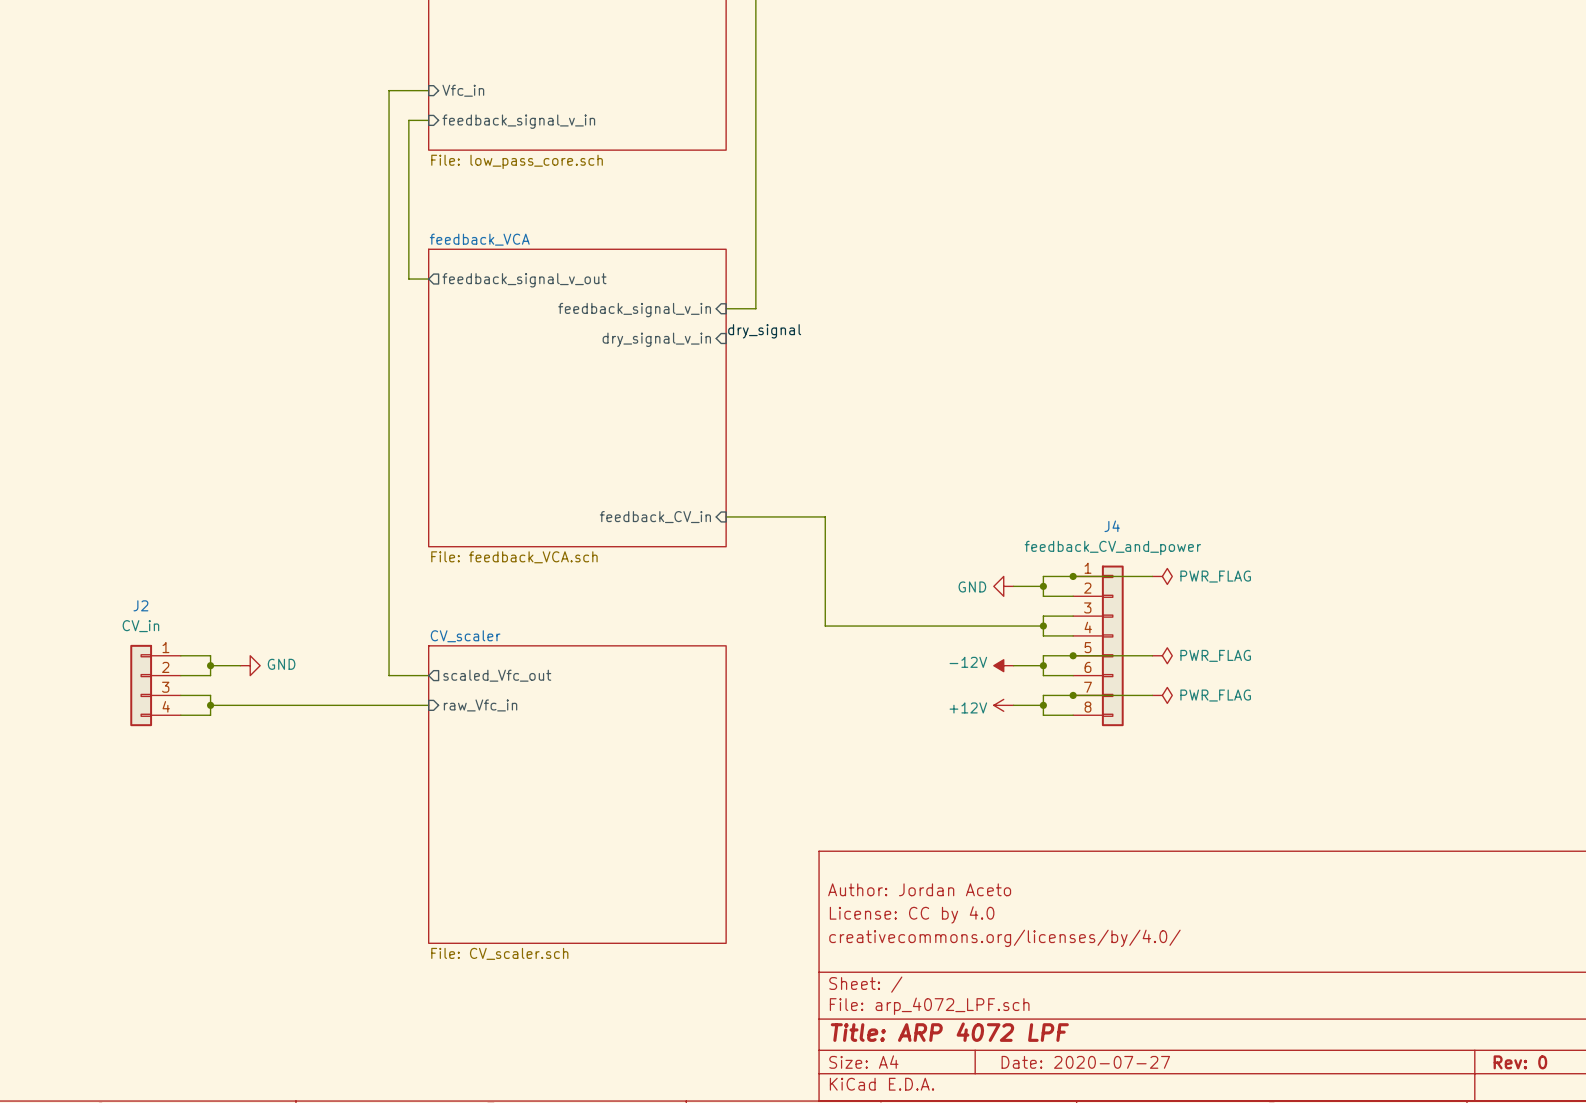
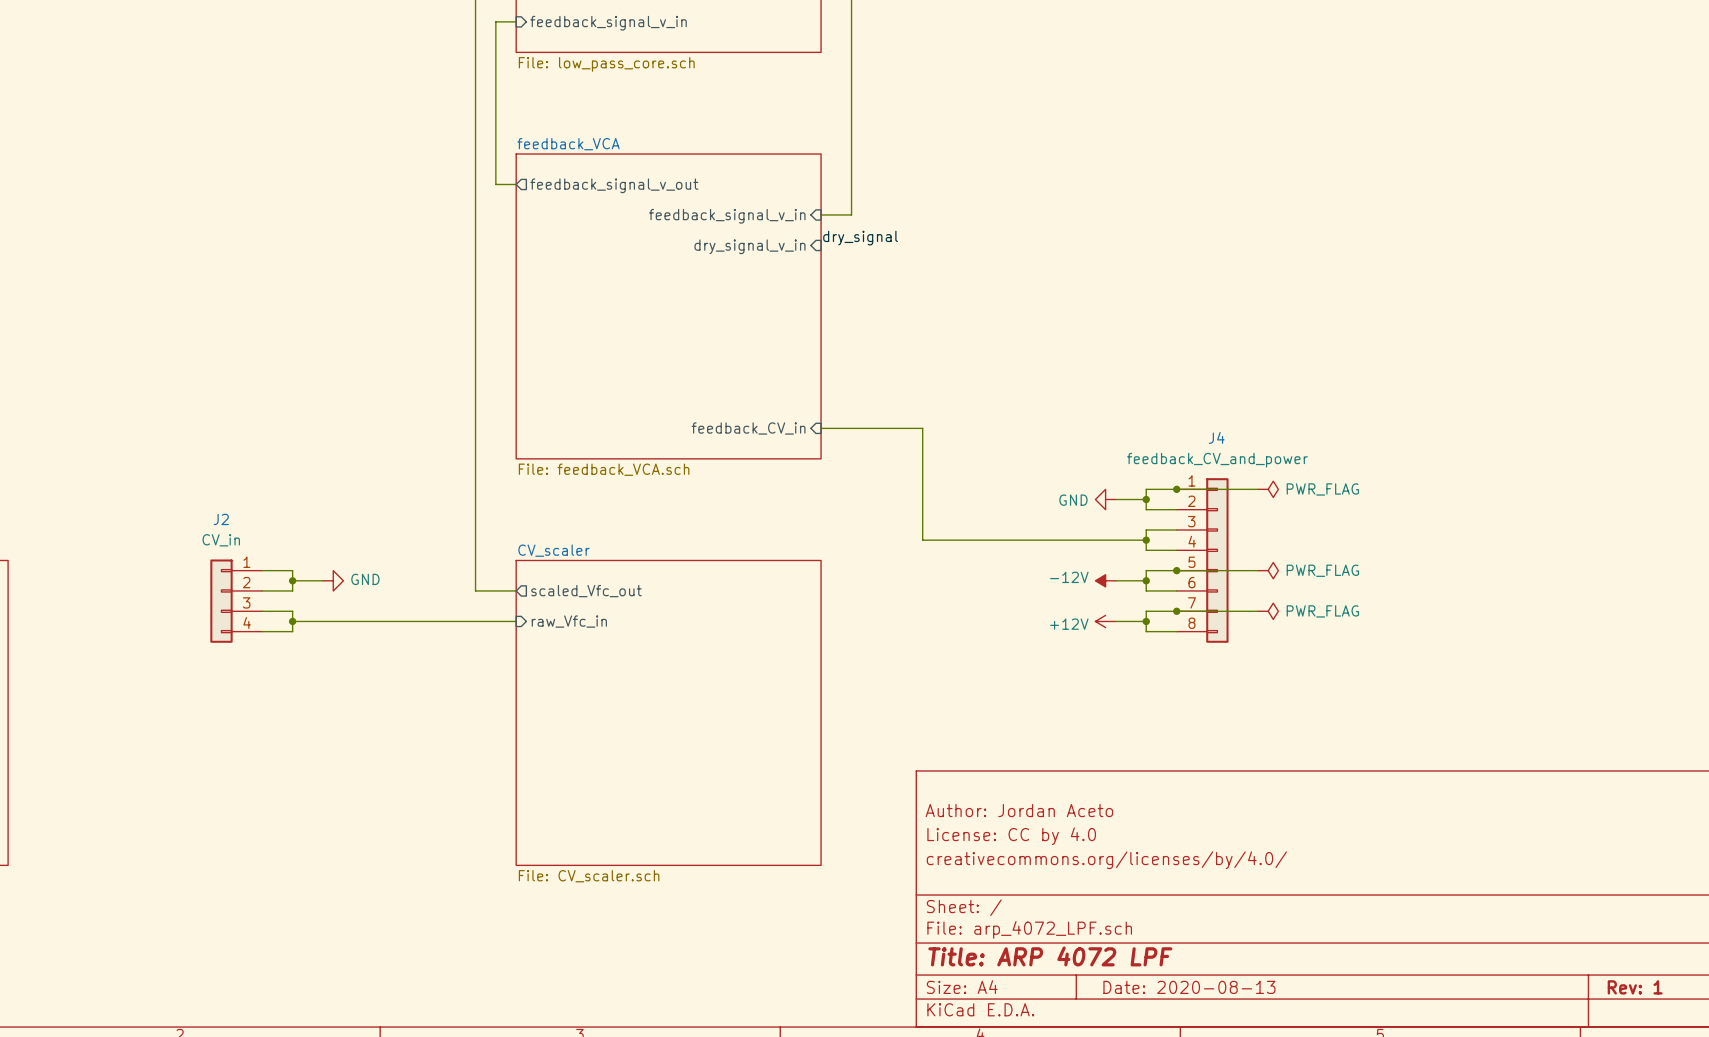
title block: Date: 2020-07-27 (1085, 1062) -> Date: 2020-08-13 (1189, 987)
title block: Rev: 0 (1520, 1062) -> Rev: 1 (1635, 987)

